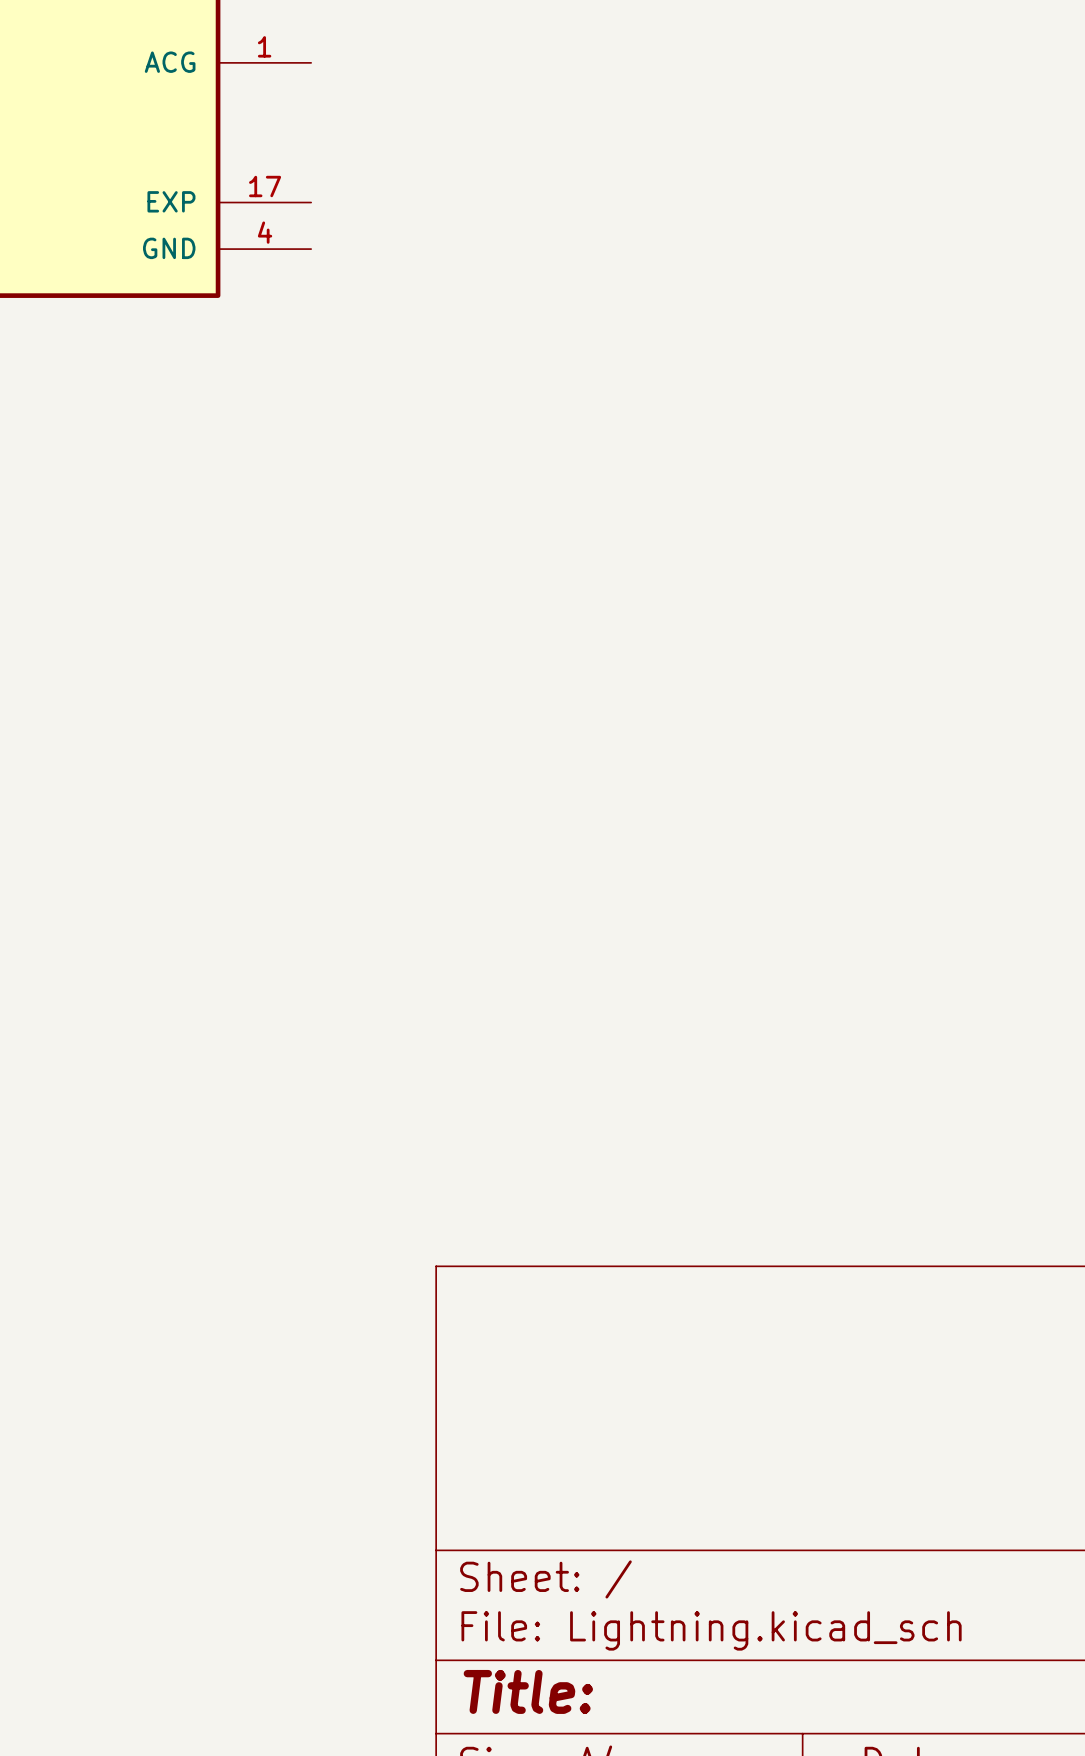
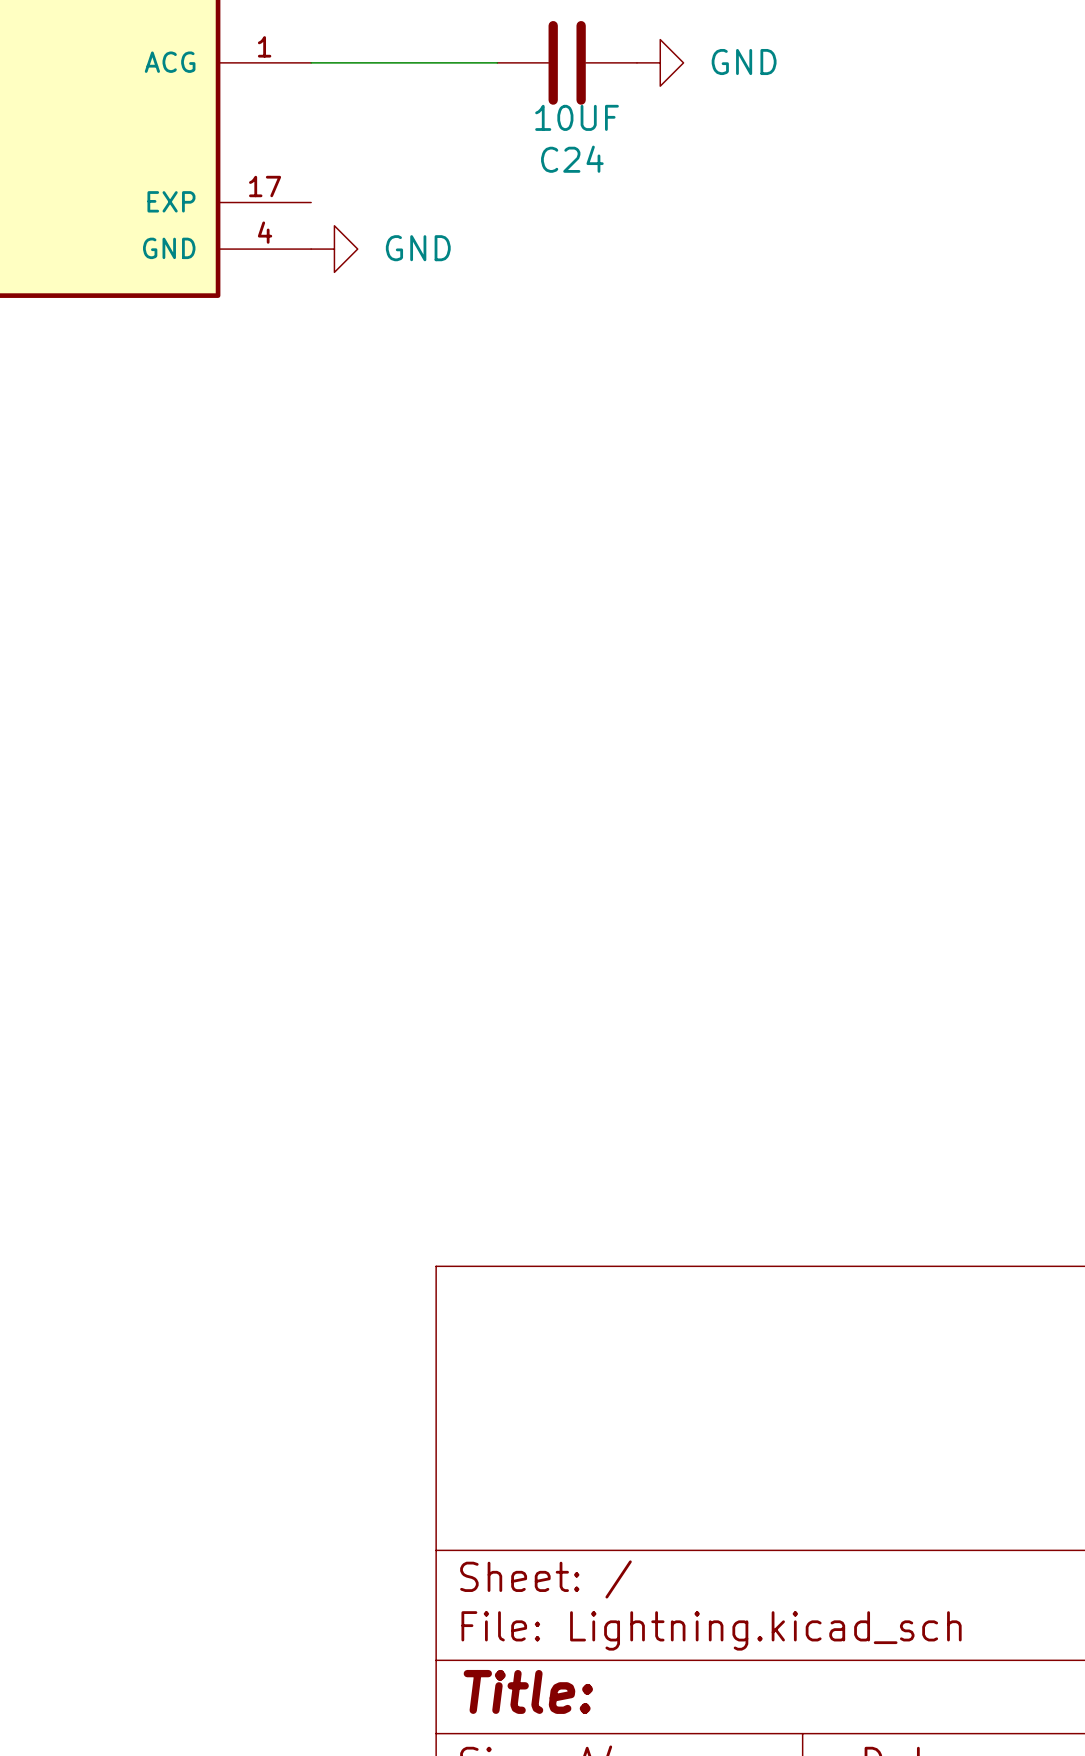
wire: none -> (311, 62) (497, 62)
C24: none -> 10UF (567, 62)
power symbol: none -> GND (660, 62)
power symbol: none -> GND (334, 249)

